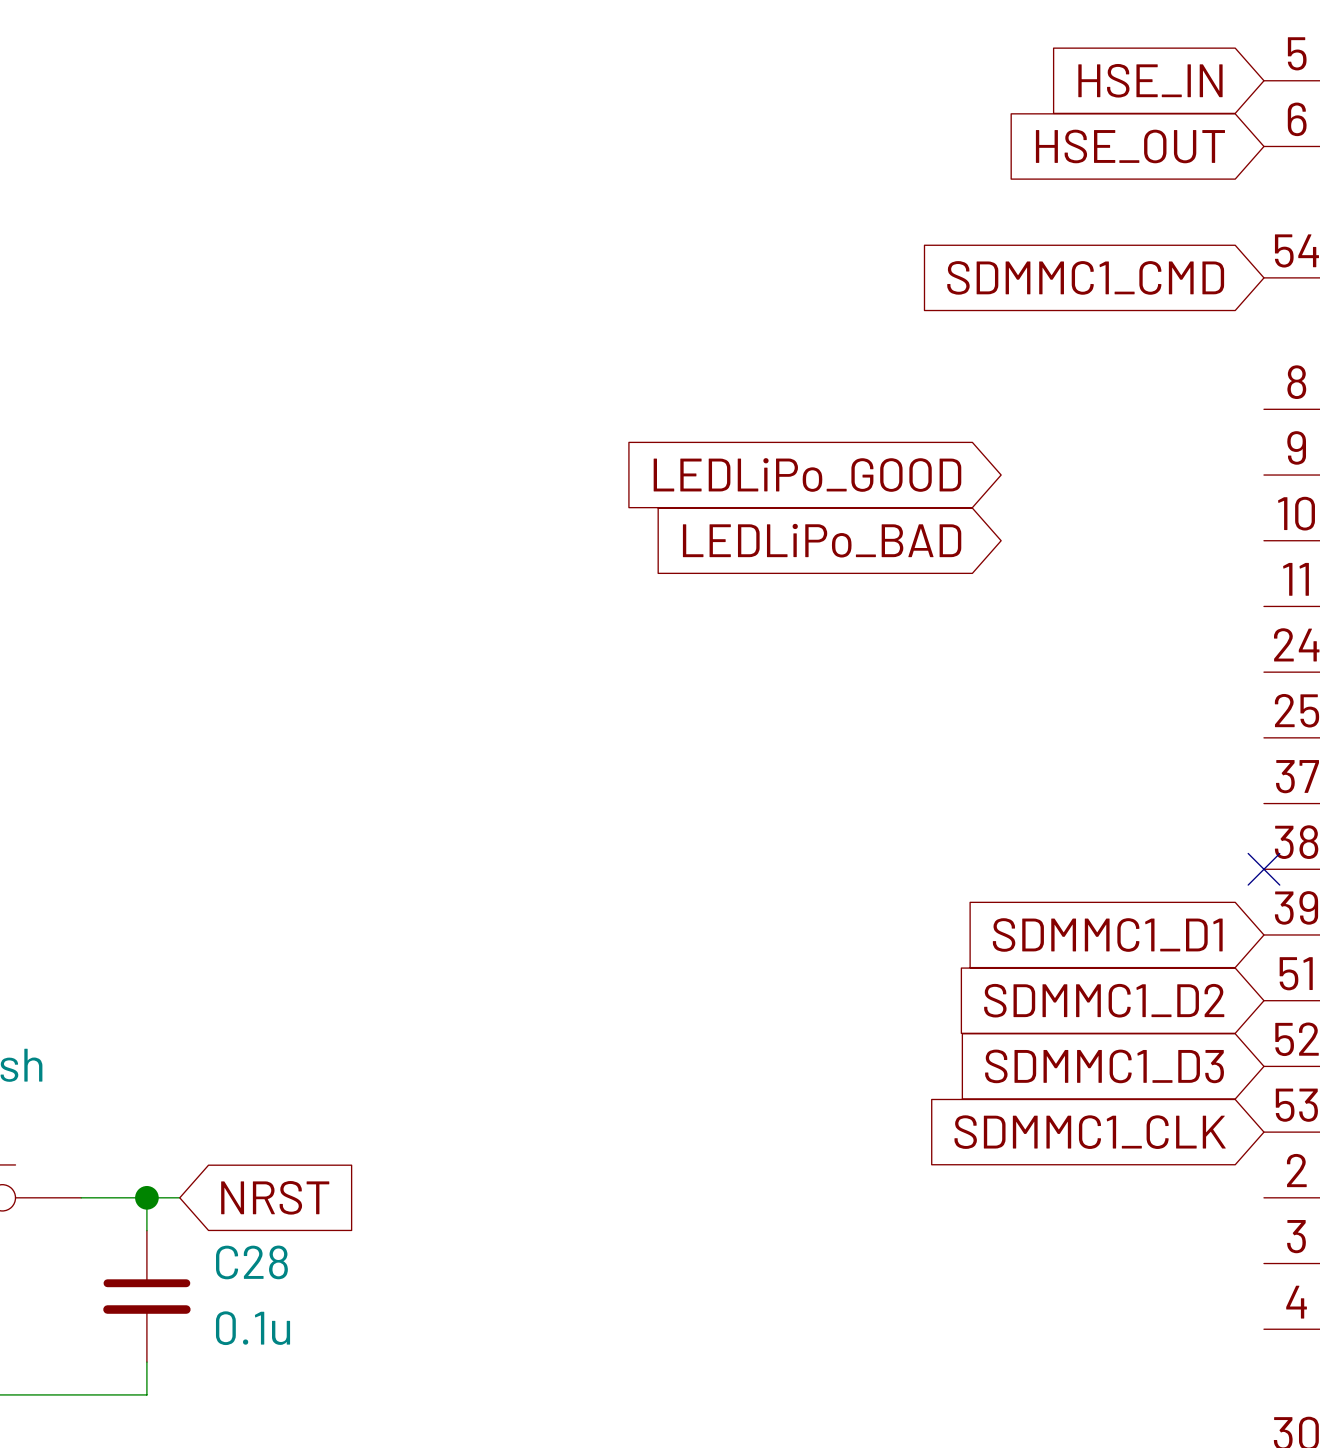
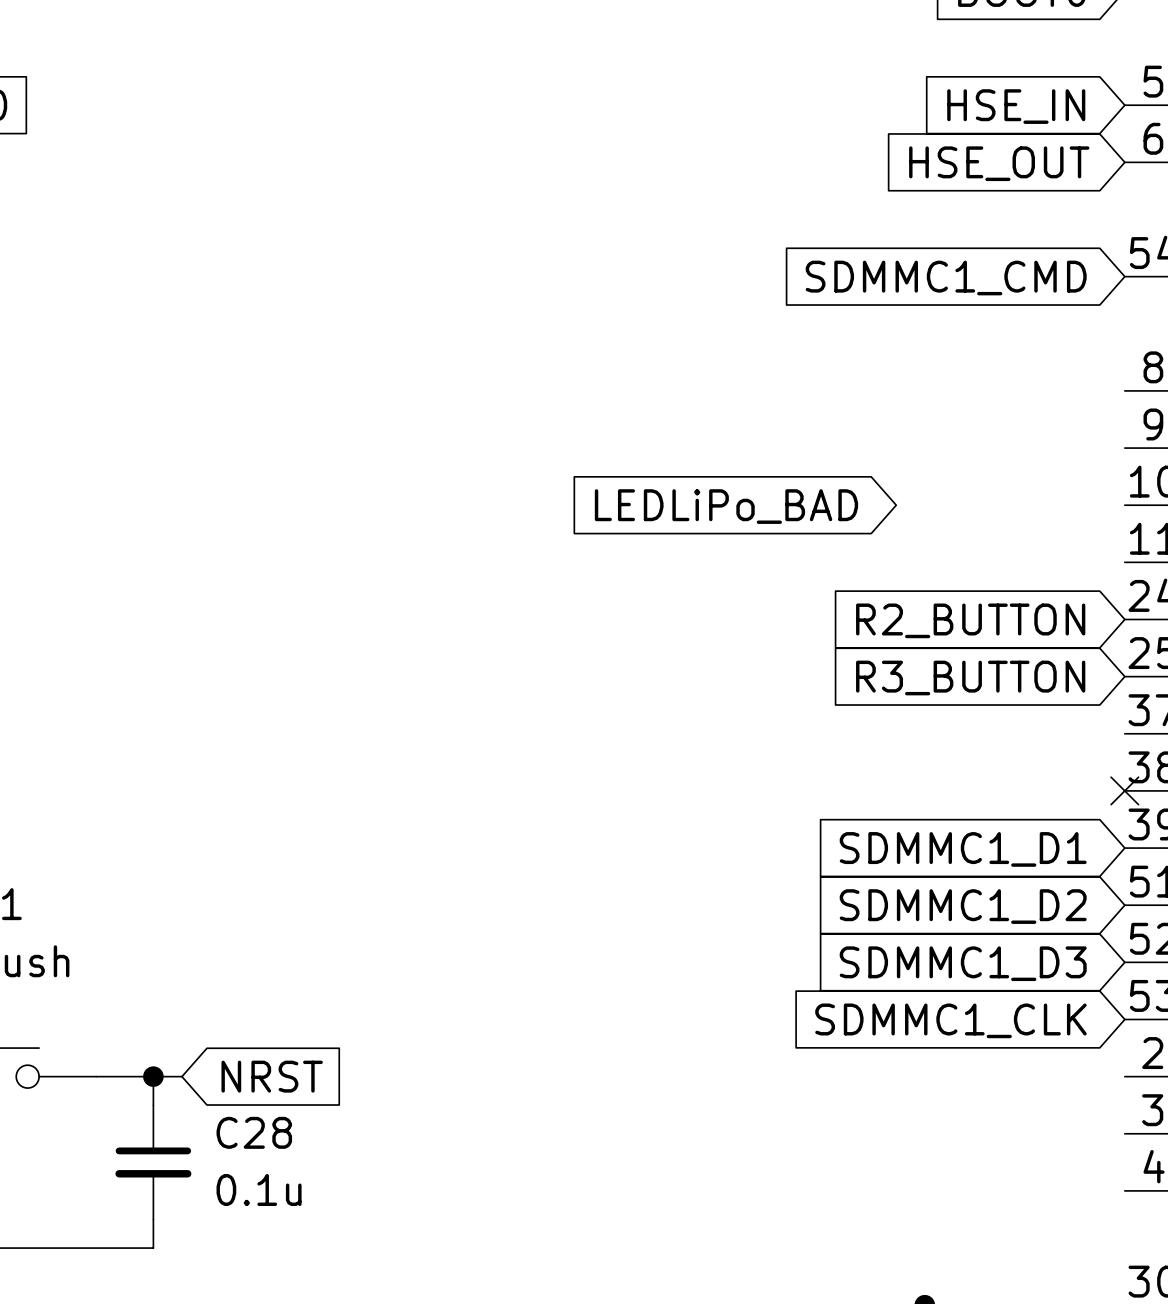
global label: LEDLiPo_GOOD (807, 474) -> none
global label: none -> R2_BUTTON (970, 620)
global label: none -> R3_BUTTON (970, 678)

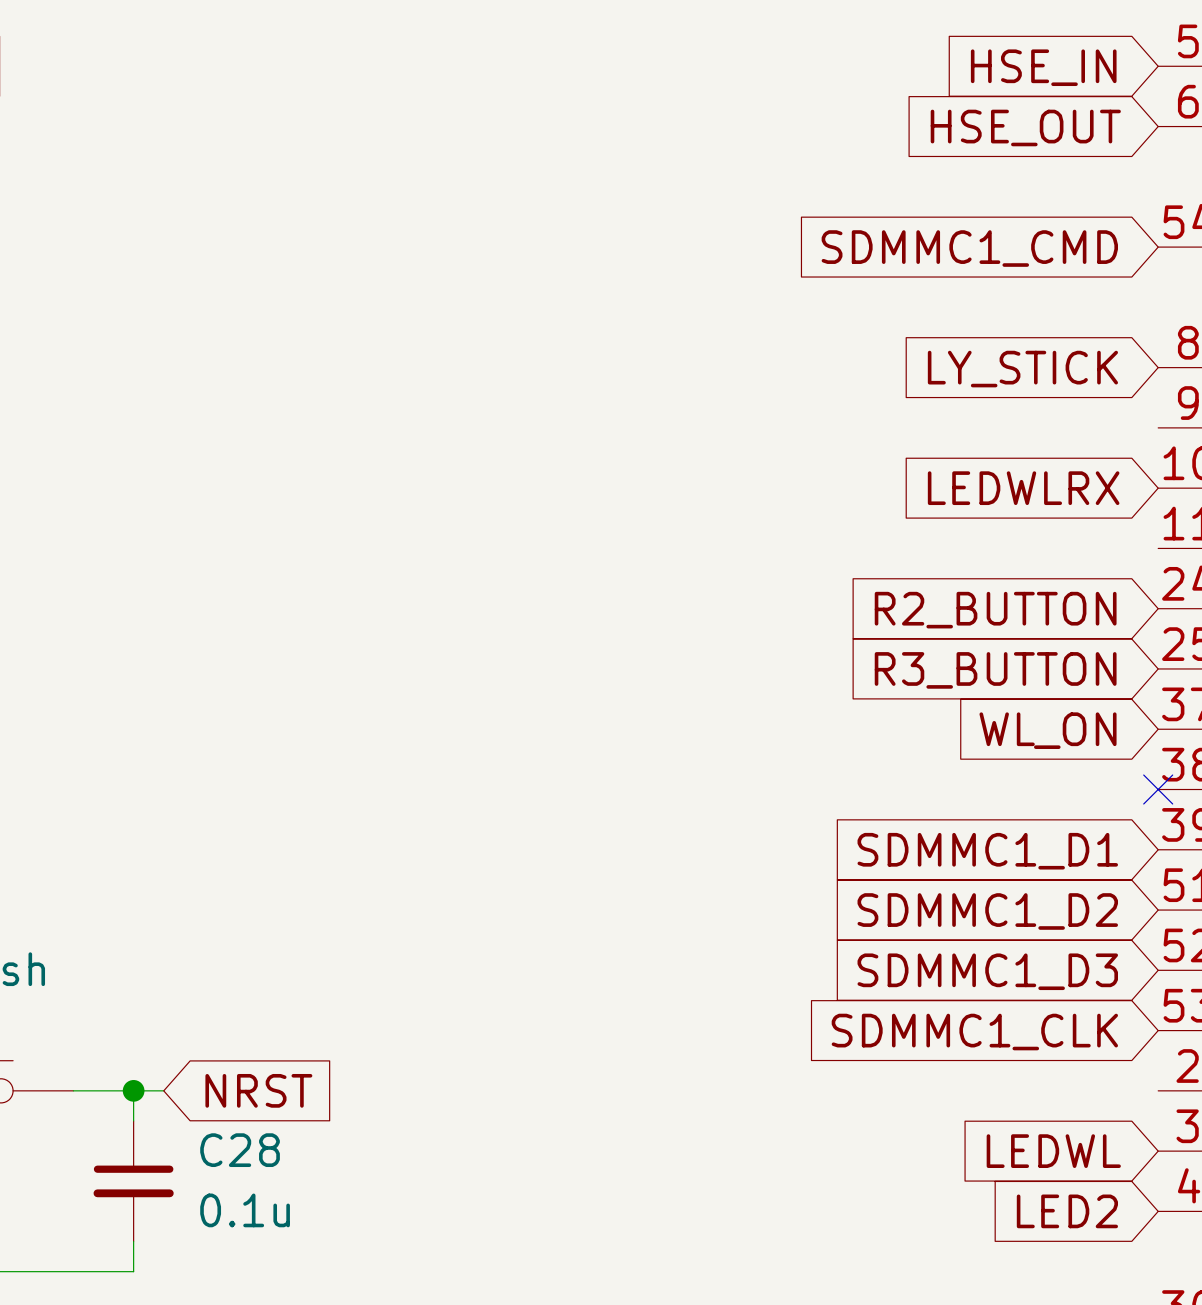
global label: none -> LY_STICK (1022, 369)
global label: none -> LEDWLRX (1023, 488)
global label: LEDLiPo_BAD (726, 506) -> none
global label: none -> WL_ON (1048, 730)
global label: none -> LEDWL (1053, 1151)
global label: none -> LED2 (1067, 1211)

